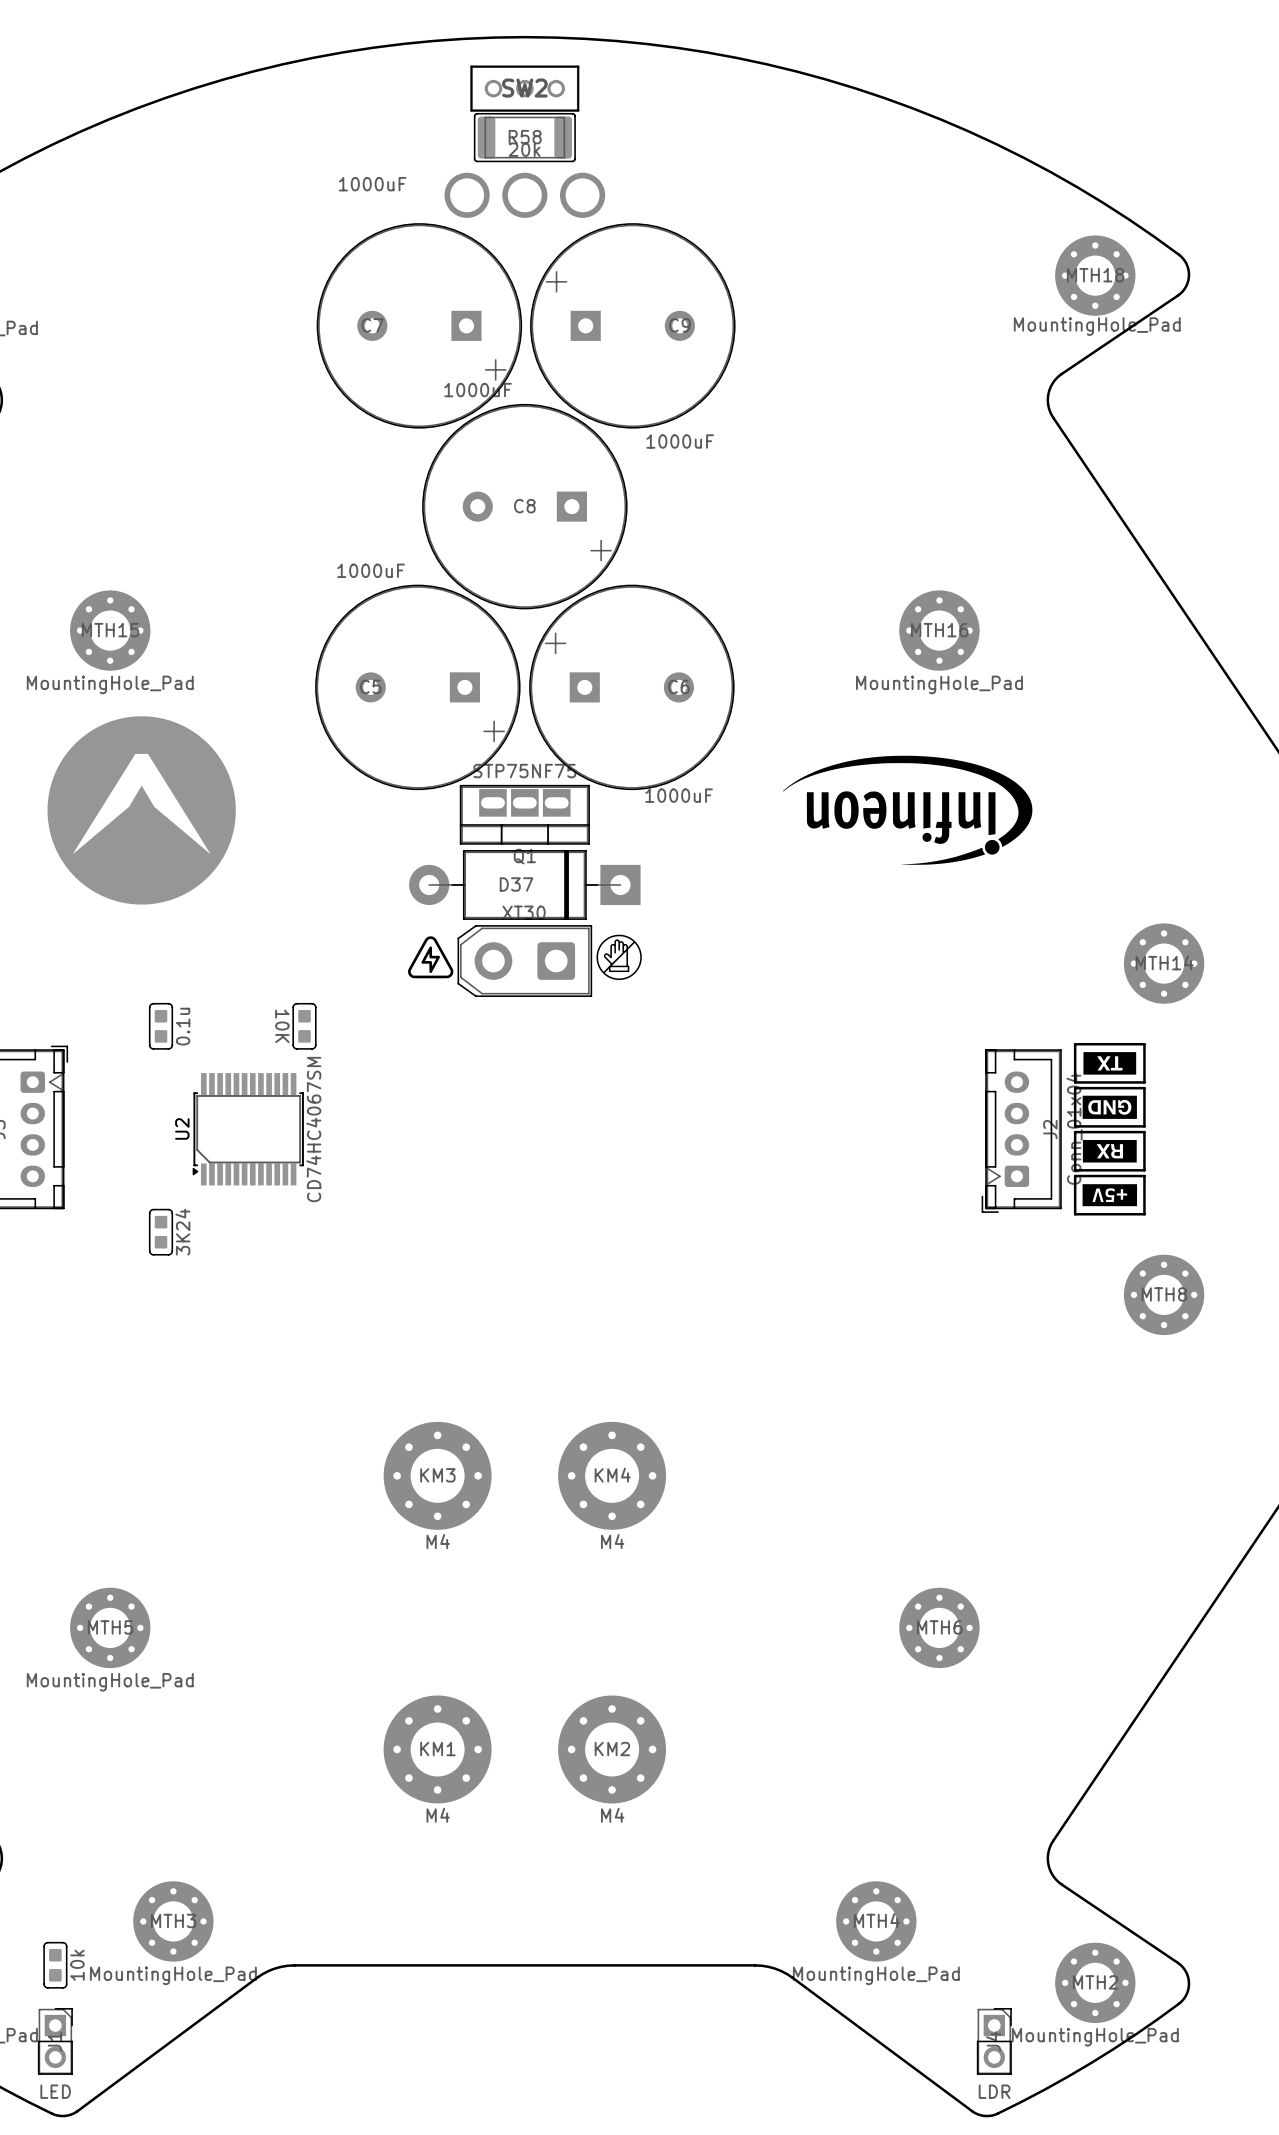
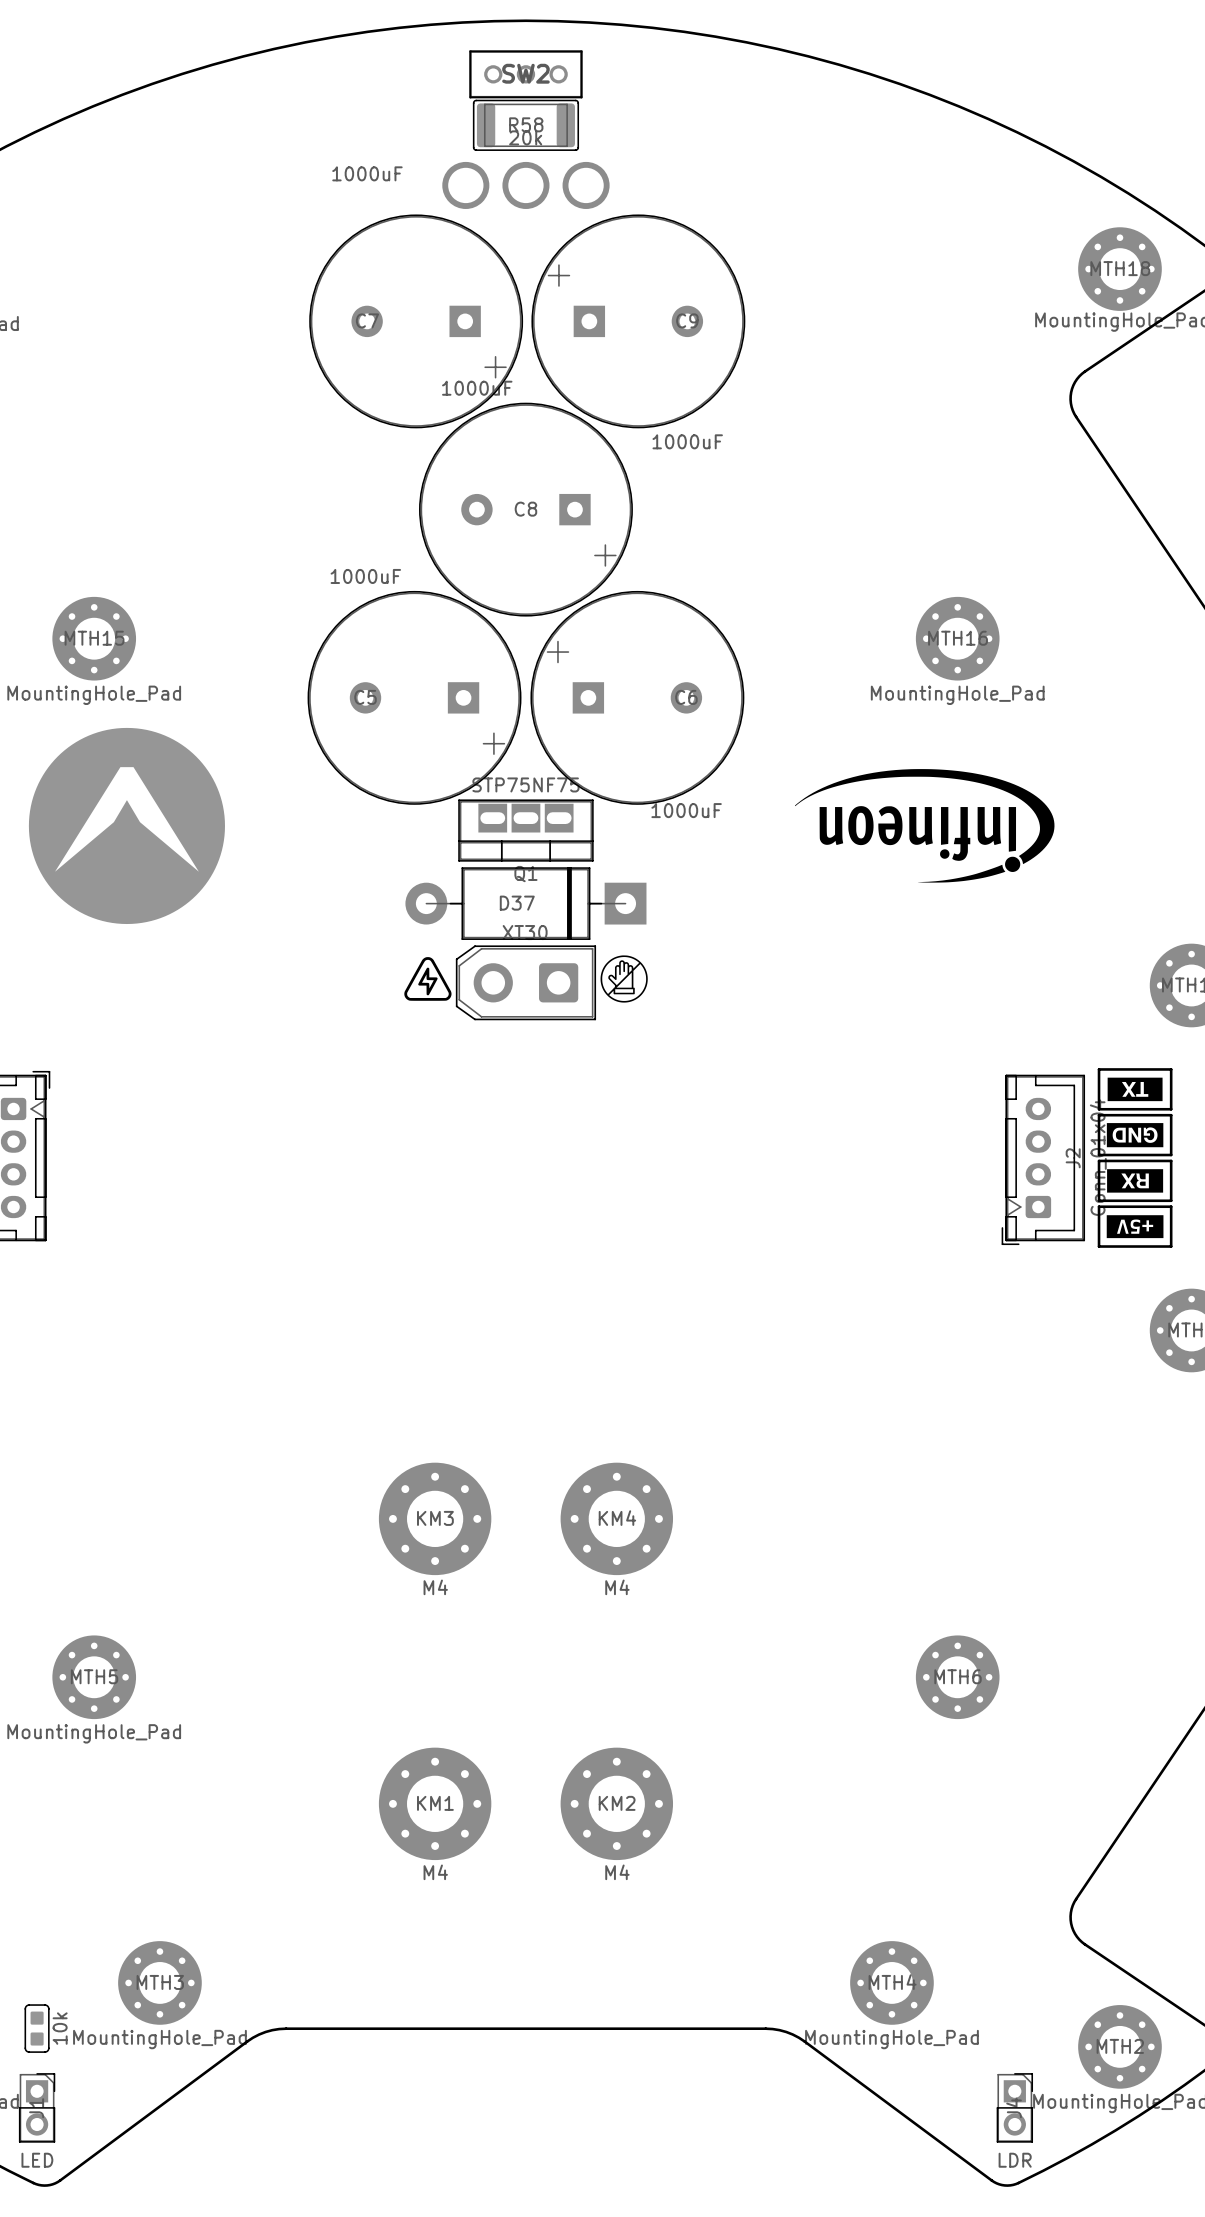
part: 0.1u (161, 1026) -> none
part: 10K (304, 1026) -> none
U2: CD74HC4067SM (248, 1129) -> none
part: 3K24 (161, 1232) -> none

